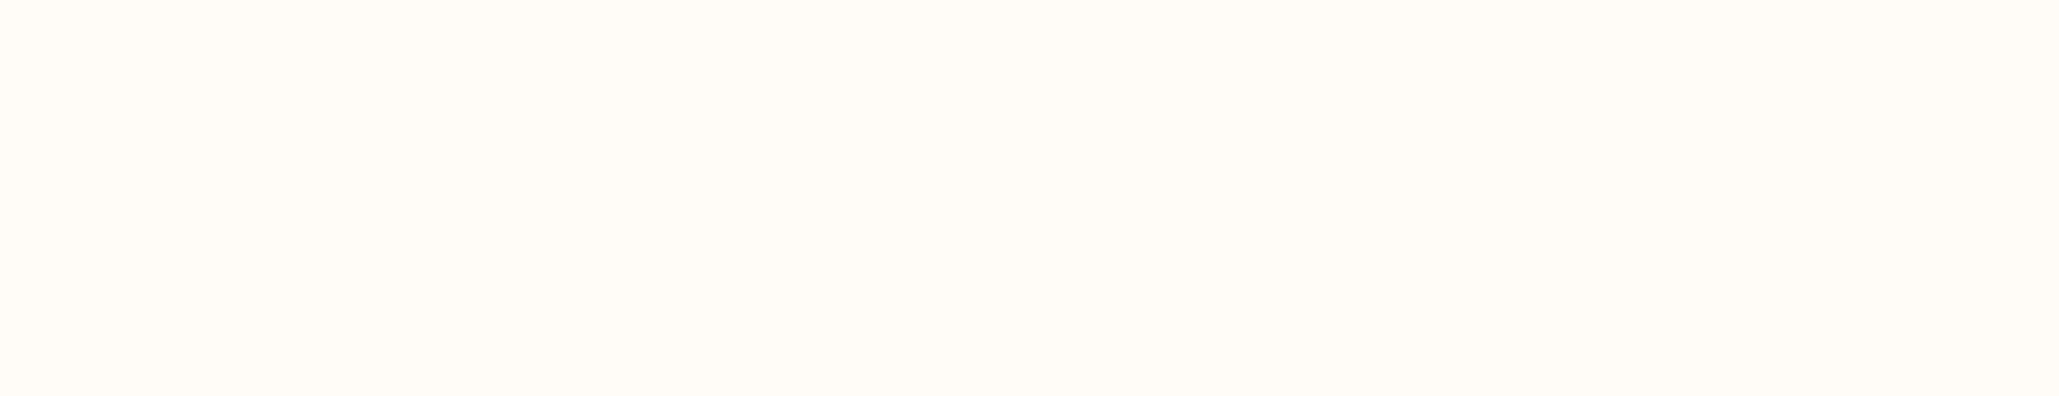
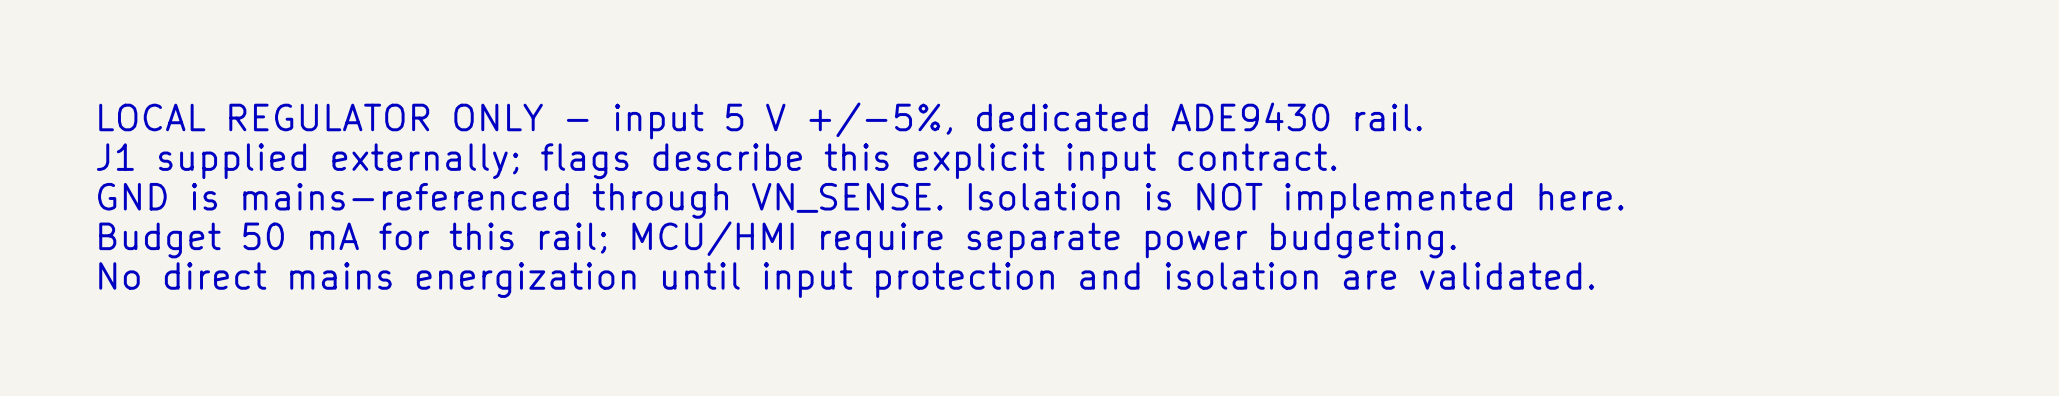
text: none -> LOCAL REGULATOR ONLY - input 5 V +/-5%, dedicated ADE9430 rail. (760, 120)
text: none -> J1 supplied externally; flags describe this explicit input contract. (716, 161)
text: none -> GND is mains-referenced through VN_SENSE. Isolation is NOT implemented here. (860, 200)
text: none -> Budget 50 mA for this rail; MCU/HMI require separate power budgeting. (777, 239)
text: none -> No direct mains energization until input protection and isolation are validated. (846, 280)

